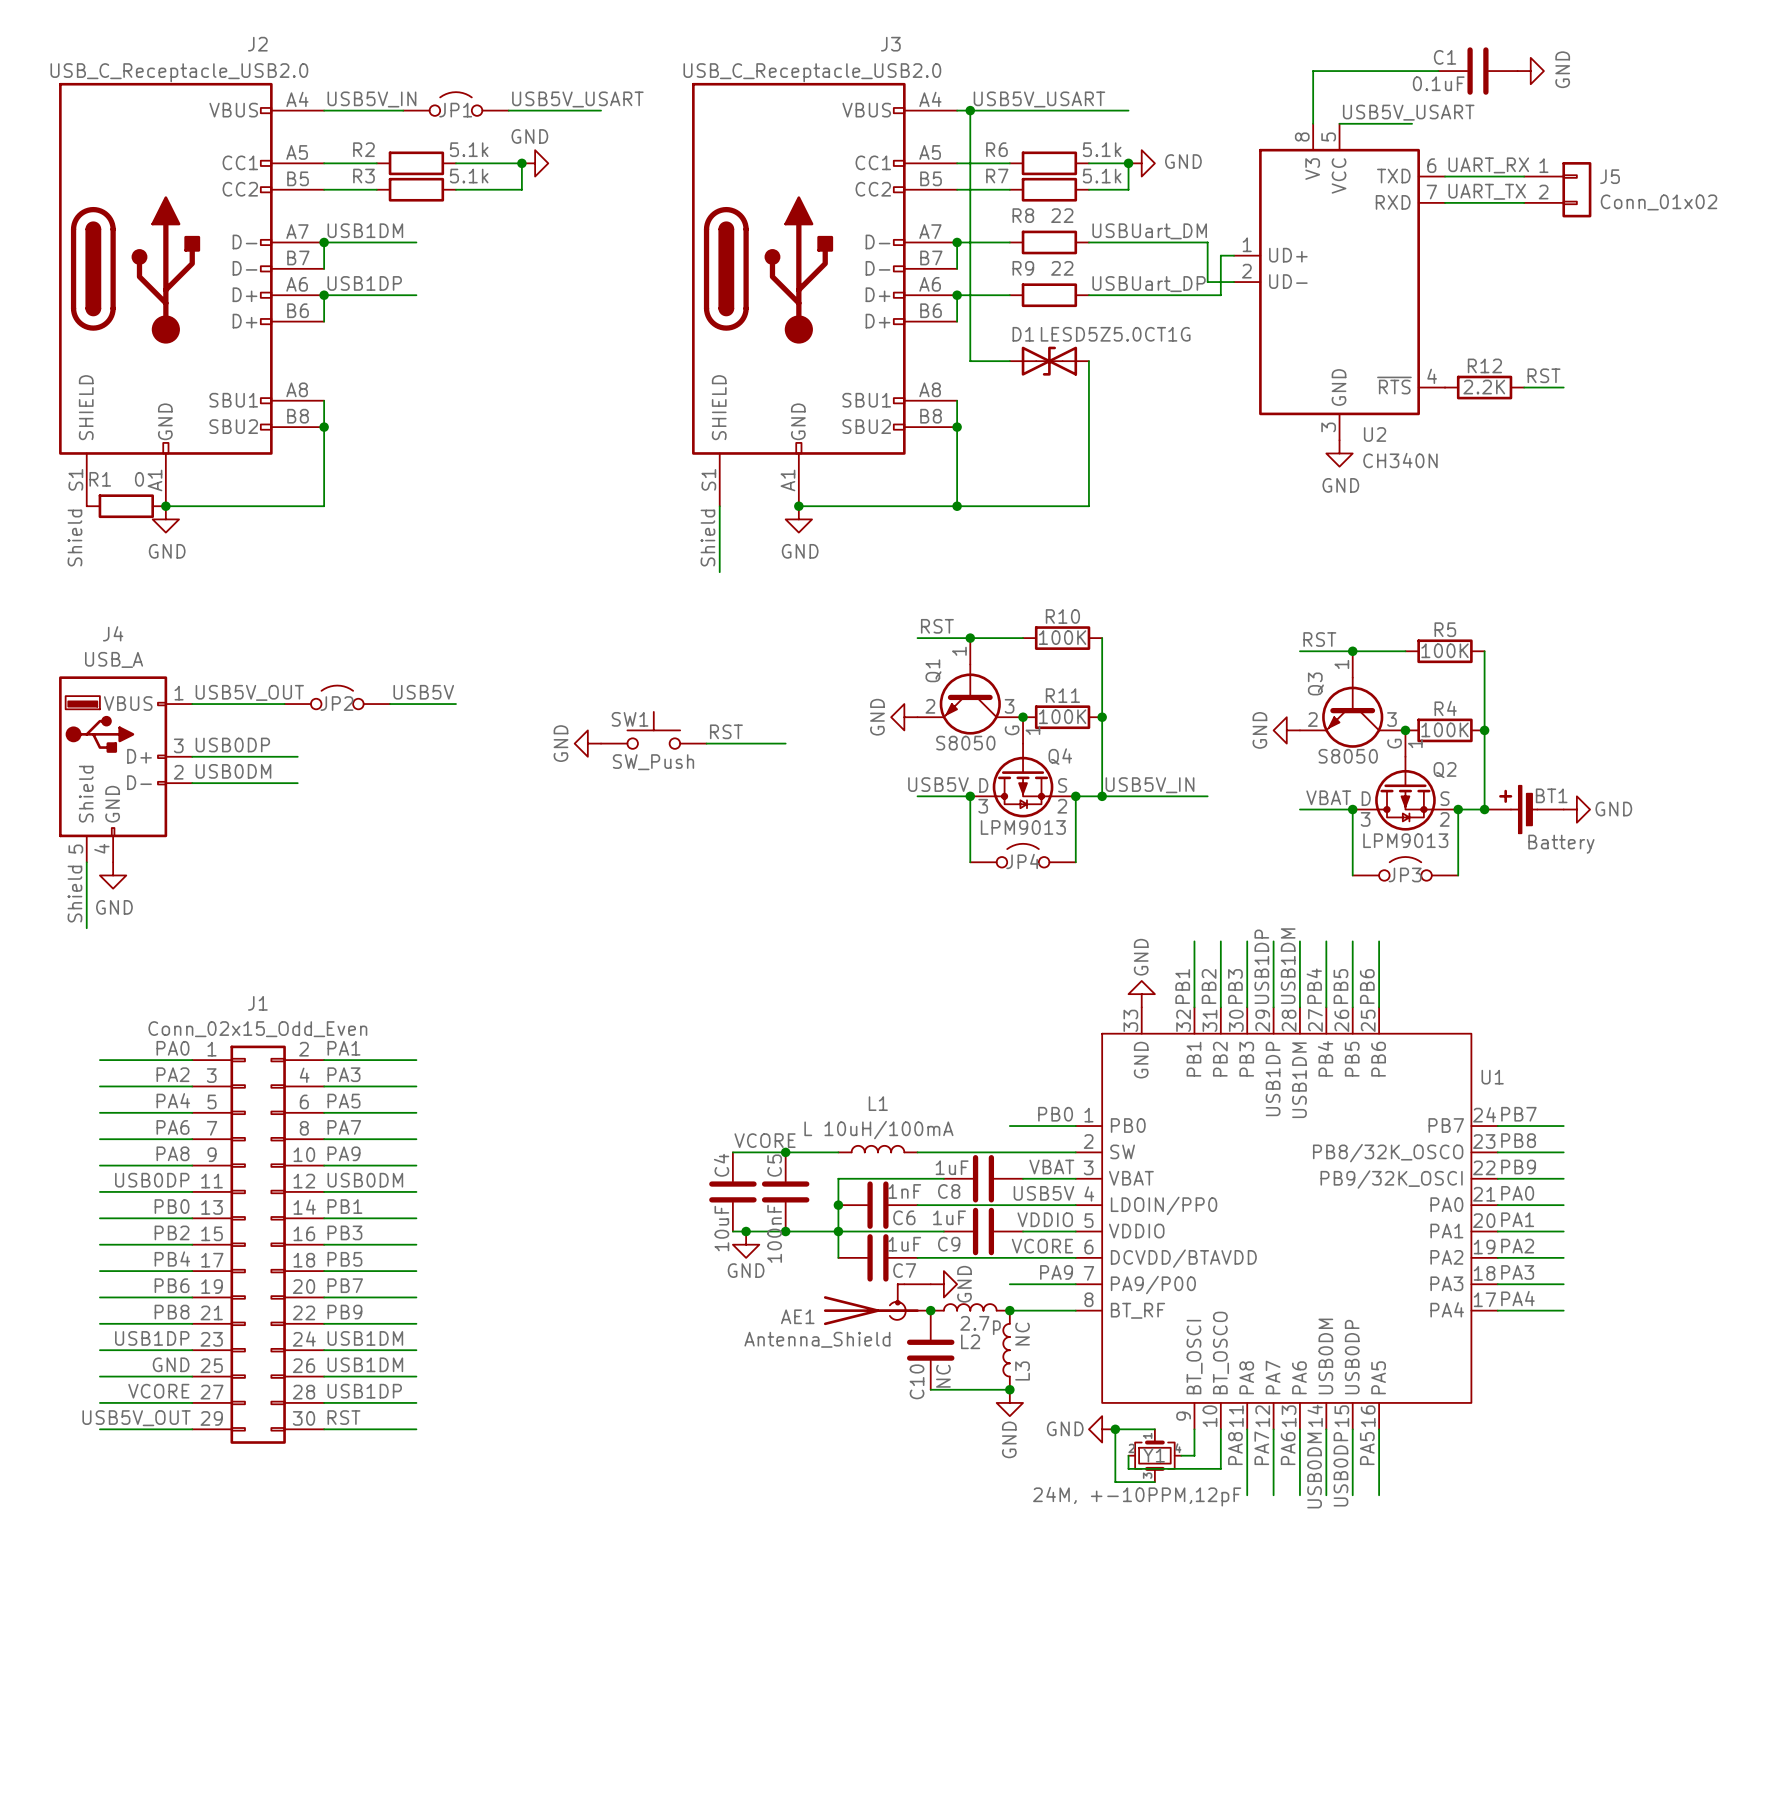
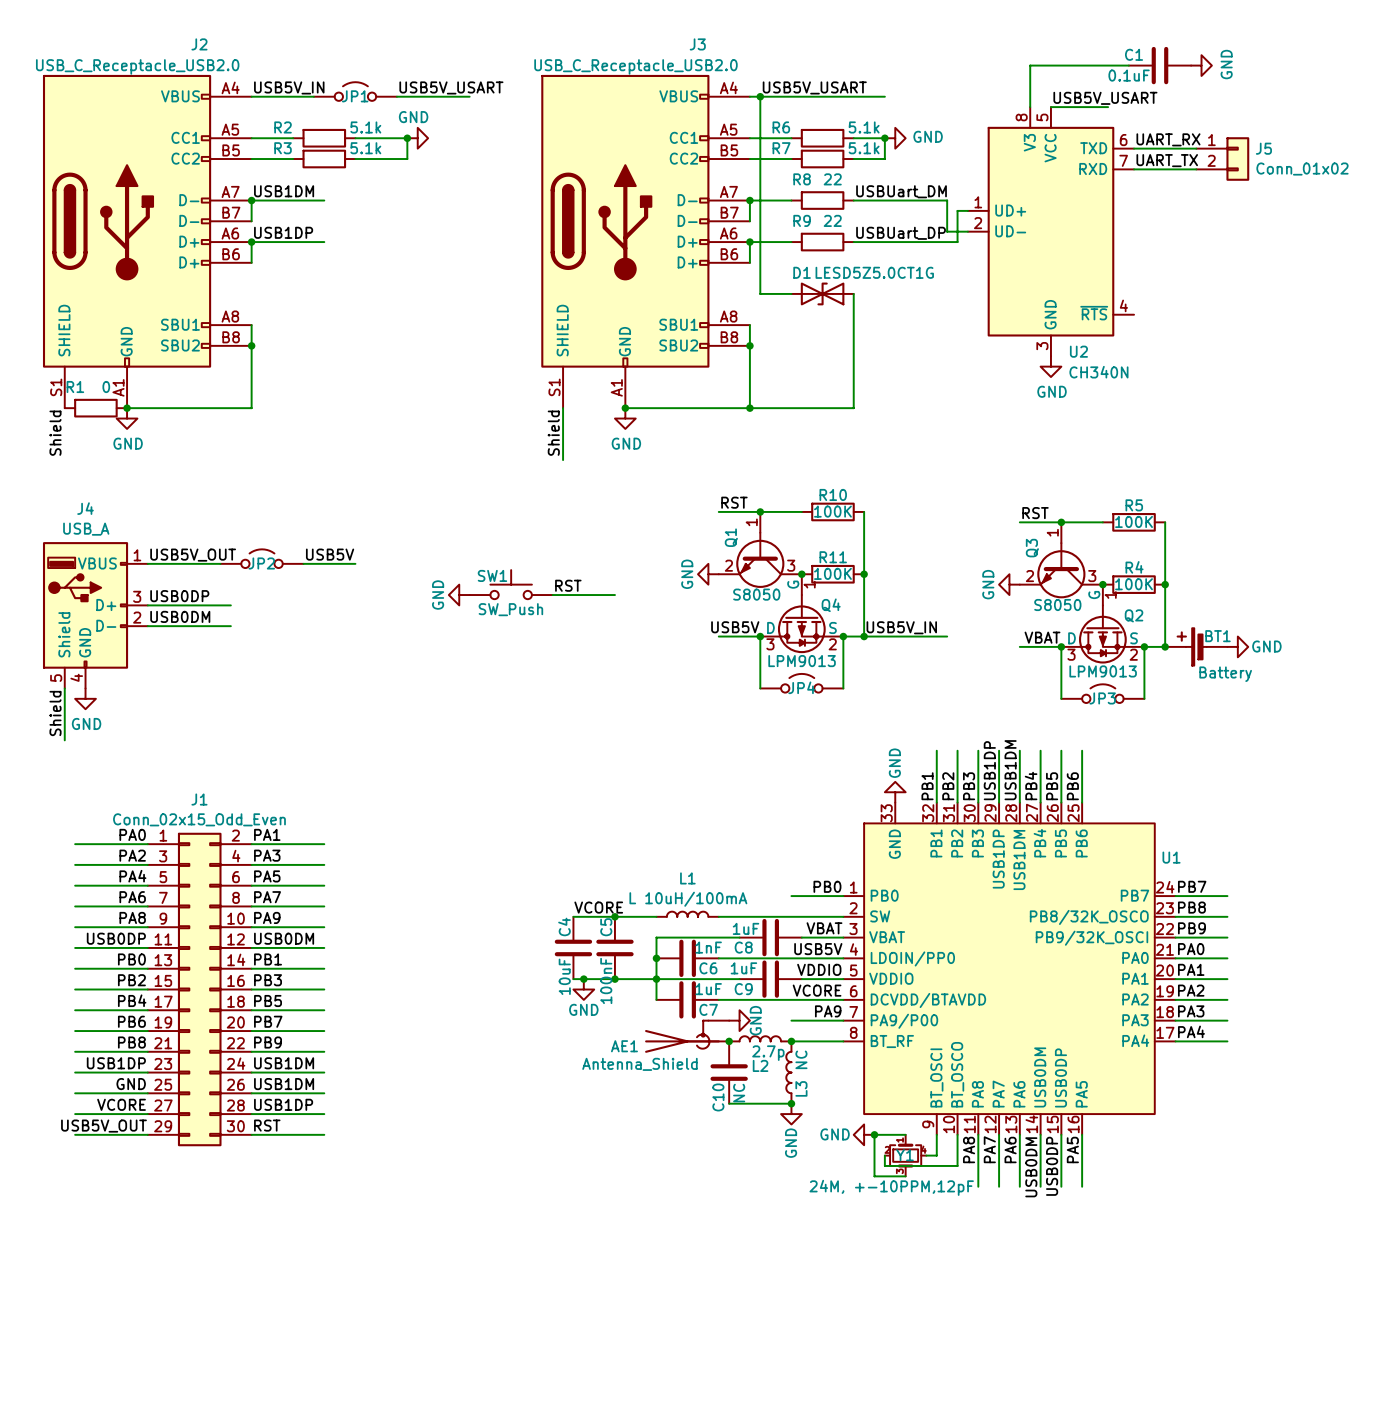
label: RST (1544, 375) -> none
R12: 2.2K (1484, 387) -> none
wire: (1524, 387) (1563, 387) -> none

